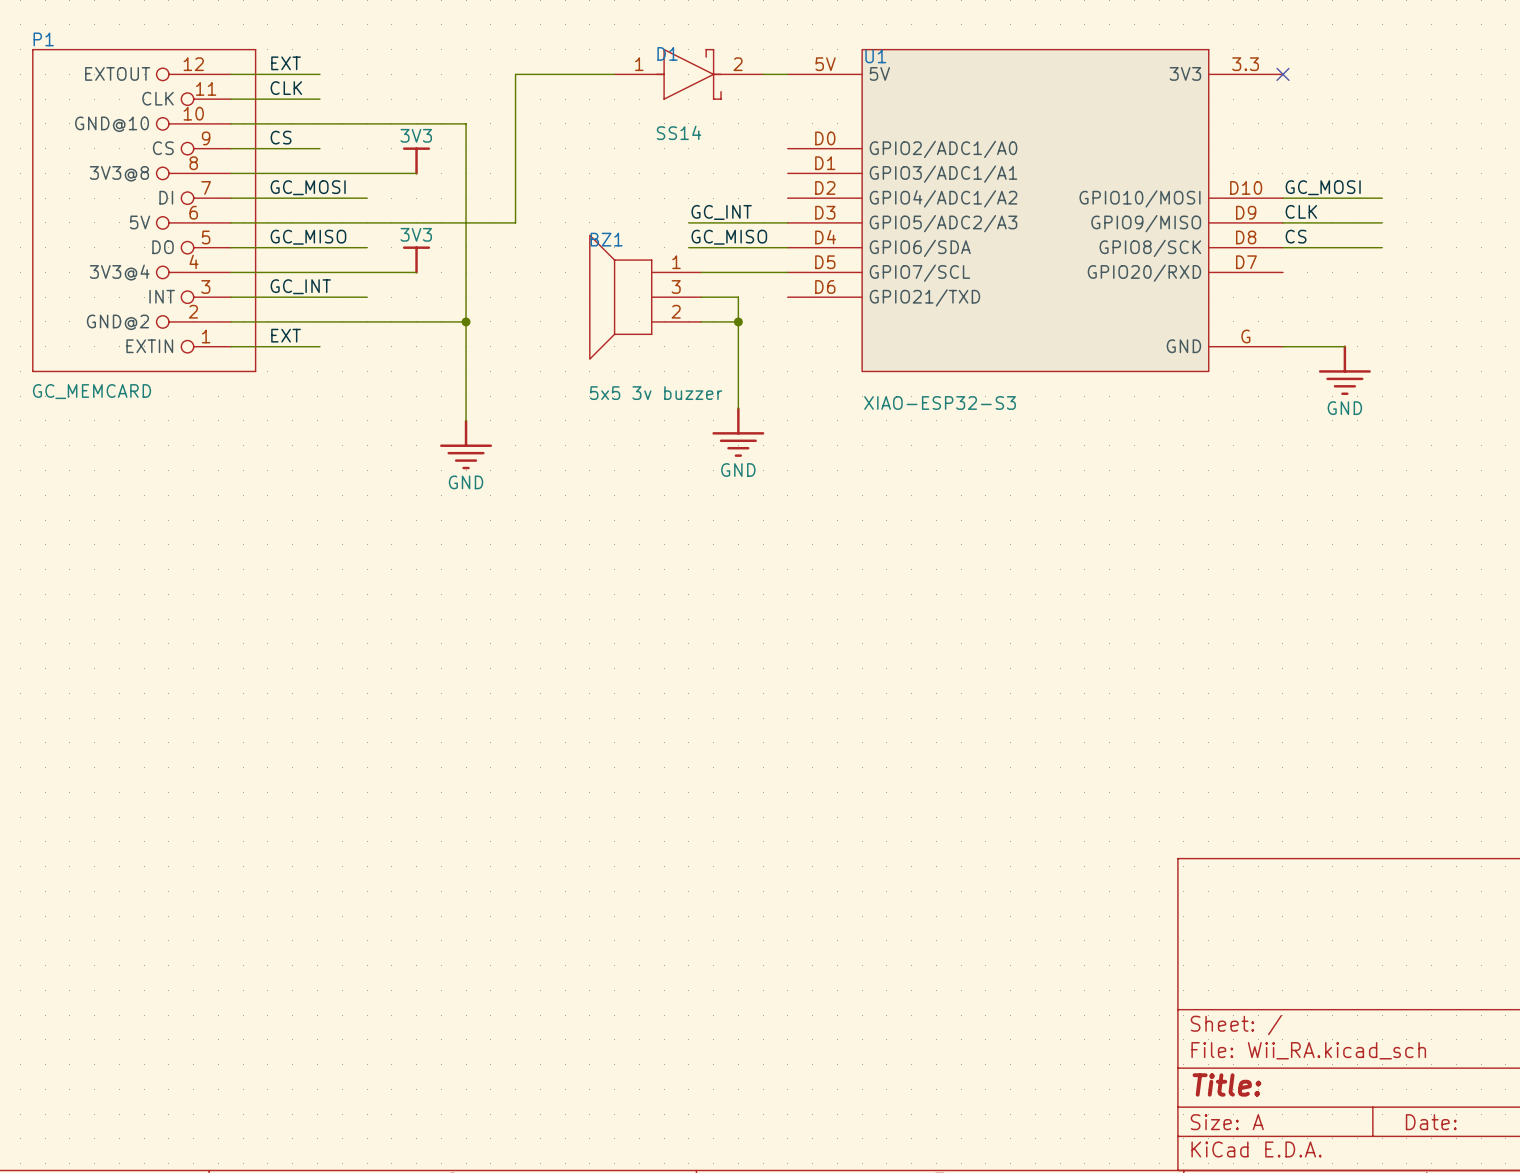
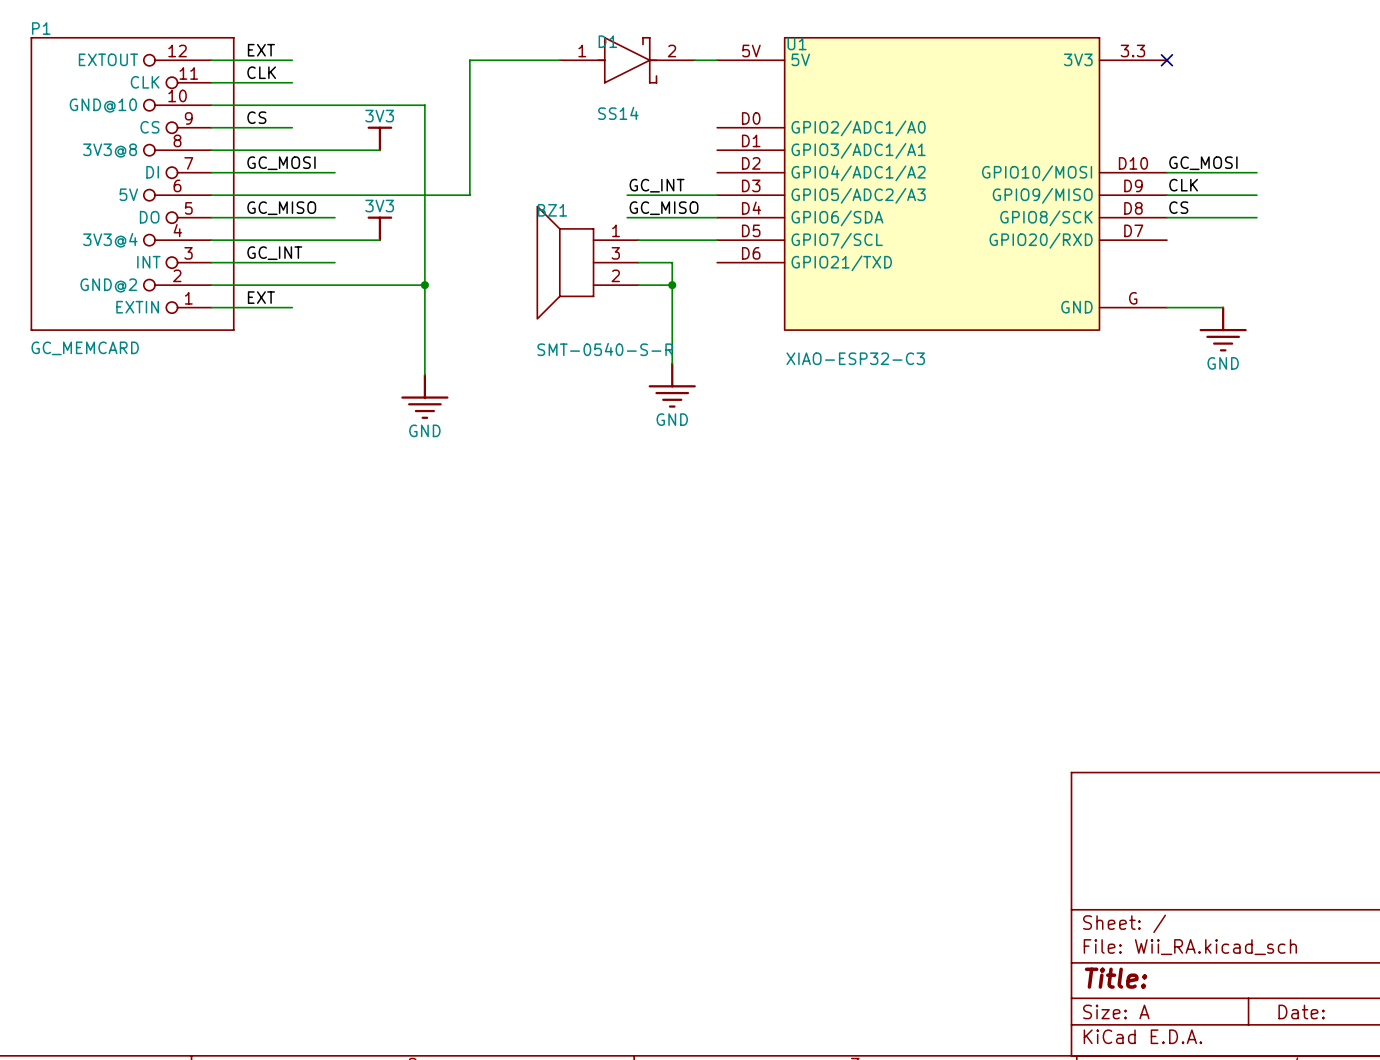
BZ1 value: 5x5 3v buzzer (656, 393) -> SMT-0540-S-R (605, 349)
U1 value: XIAO-ESP32-S3 (940, 403) -> XIAO-ESP32-C3 (855, 358)

